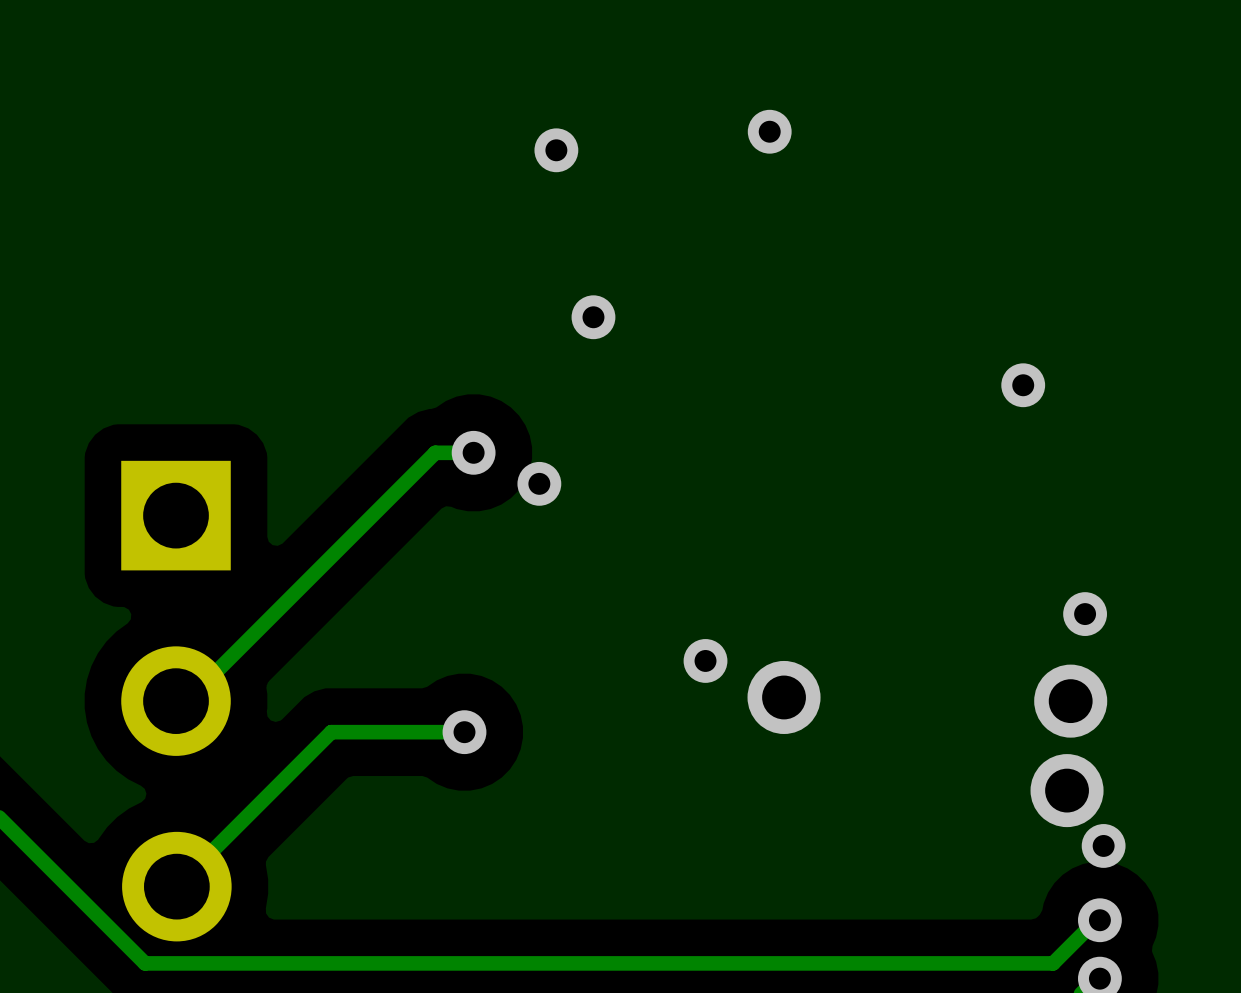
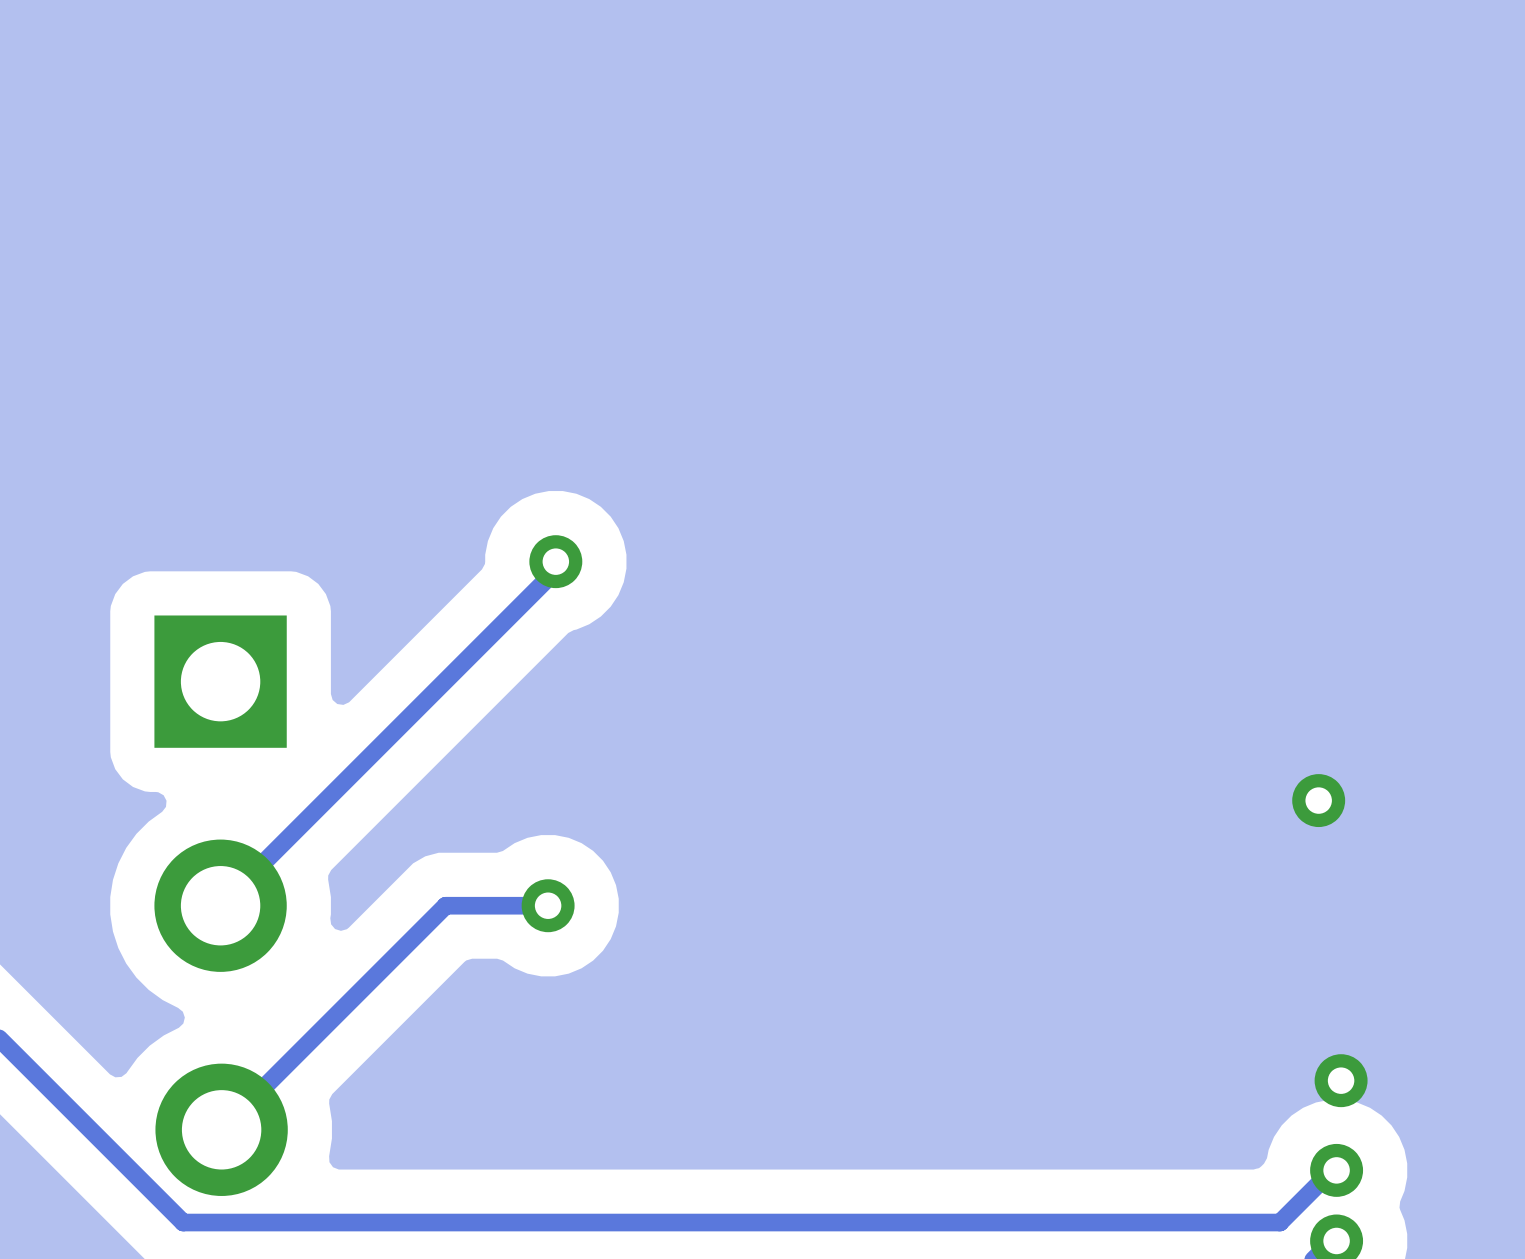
via: (769, 131) -> none
via: (556, 150) -> none
via: (593, 317) -> none
via: (1023, 385) -> none
track: (473, 452) (435, 452) (186, 701) (176, 701) -> (555, 561) (555, 570) (220, 905)
via position: (473, 452) -> (555, 561)
via: (539, 483) -> none
via: (705, 660) -> none
via: (784, 697) -> none
via: (1070, 701) -> none
track: (464, 732) (331, 732) -> (548, 905) (445, 905) (408, 943)
via position: (464, 732) -> (548, 905)
via: (1067, 790) -> none

